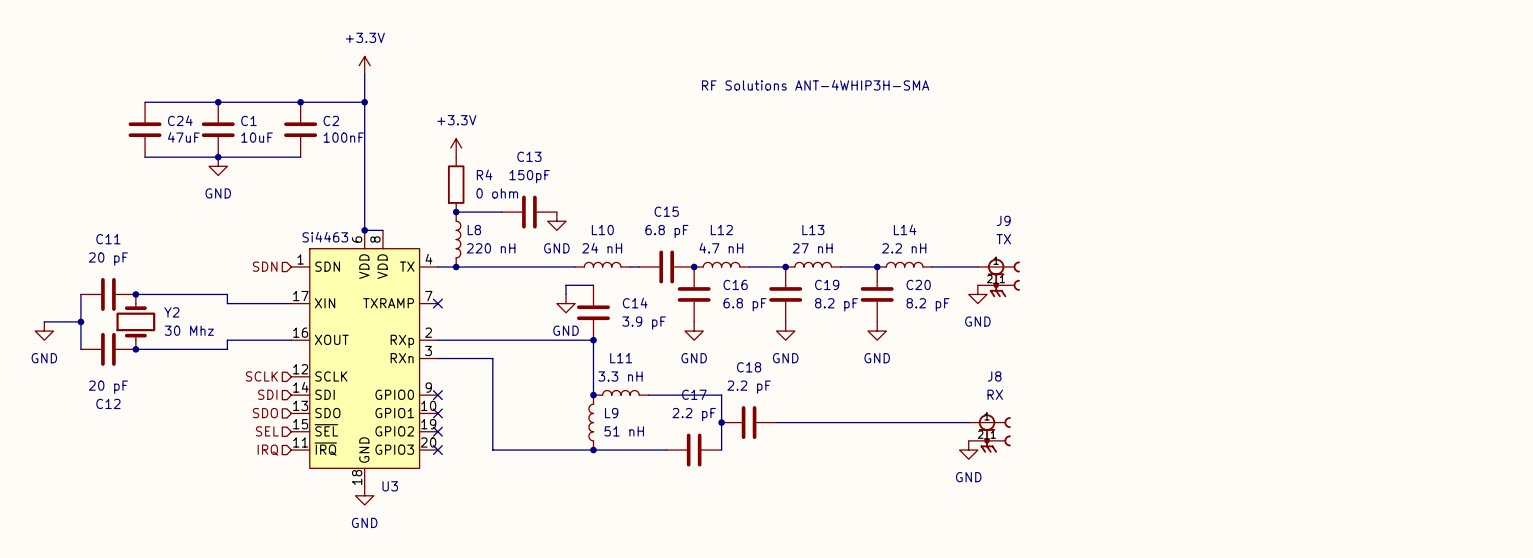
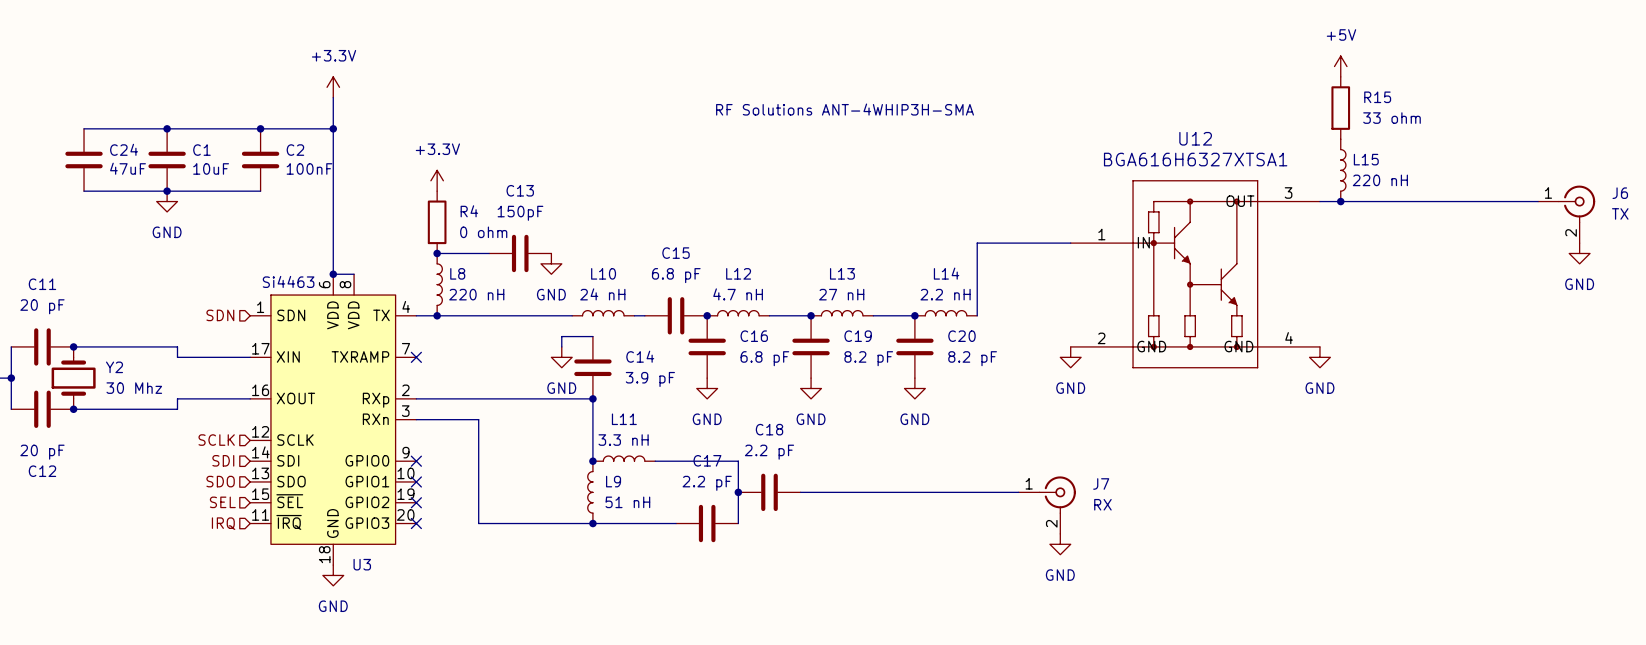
power symbol: none -> +5V (1340, 66)
R15: none -> 33 ohm (1340, 108)
L15: none -> 220 nH (1343, 170)
wire: none -> (1319, 201) (1538, 201)
junction: none -> (1340, 201)
J6: none -> TX (1566, 214)
power symbol: none -> GND (1579, 253)
U12: none -> BGA616H6327XTSA1 (1195, 274)
wire: (932, 266) (977, 266) -> (977, 315) (977, 243) (1070, 243)
J9: TX (998, 277) -> none
power symbol position: GND (977, 294) -> GND (1070, 357)
power symbol: none -> GND (1319, 357)
J8: RX (989, 433) -> none
J7: none -> RX (1047, 505)
power symbol position: GND (968, 450) -> GND (1060, 544)

